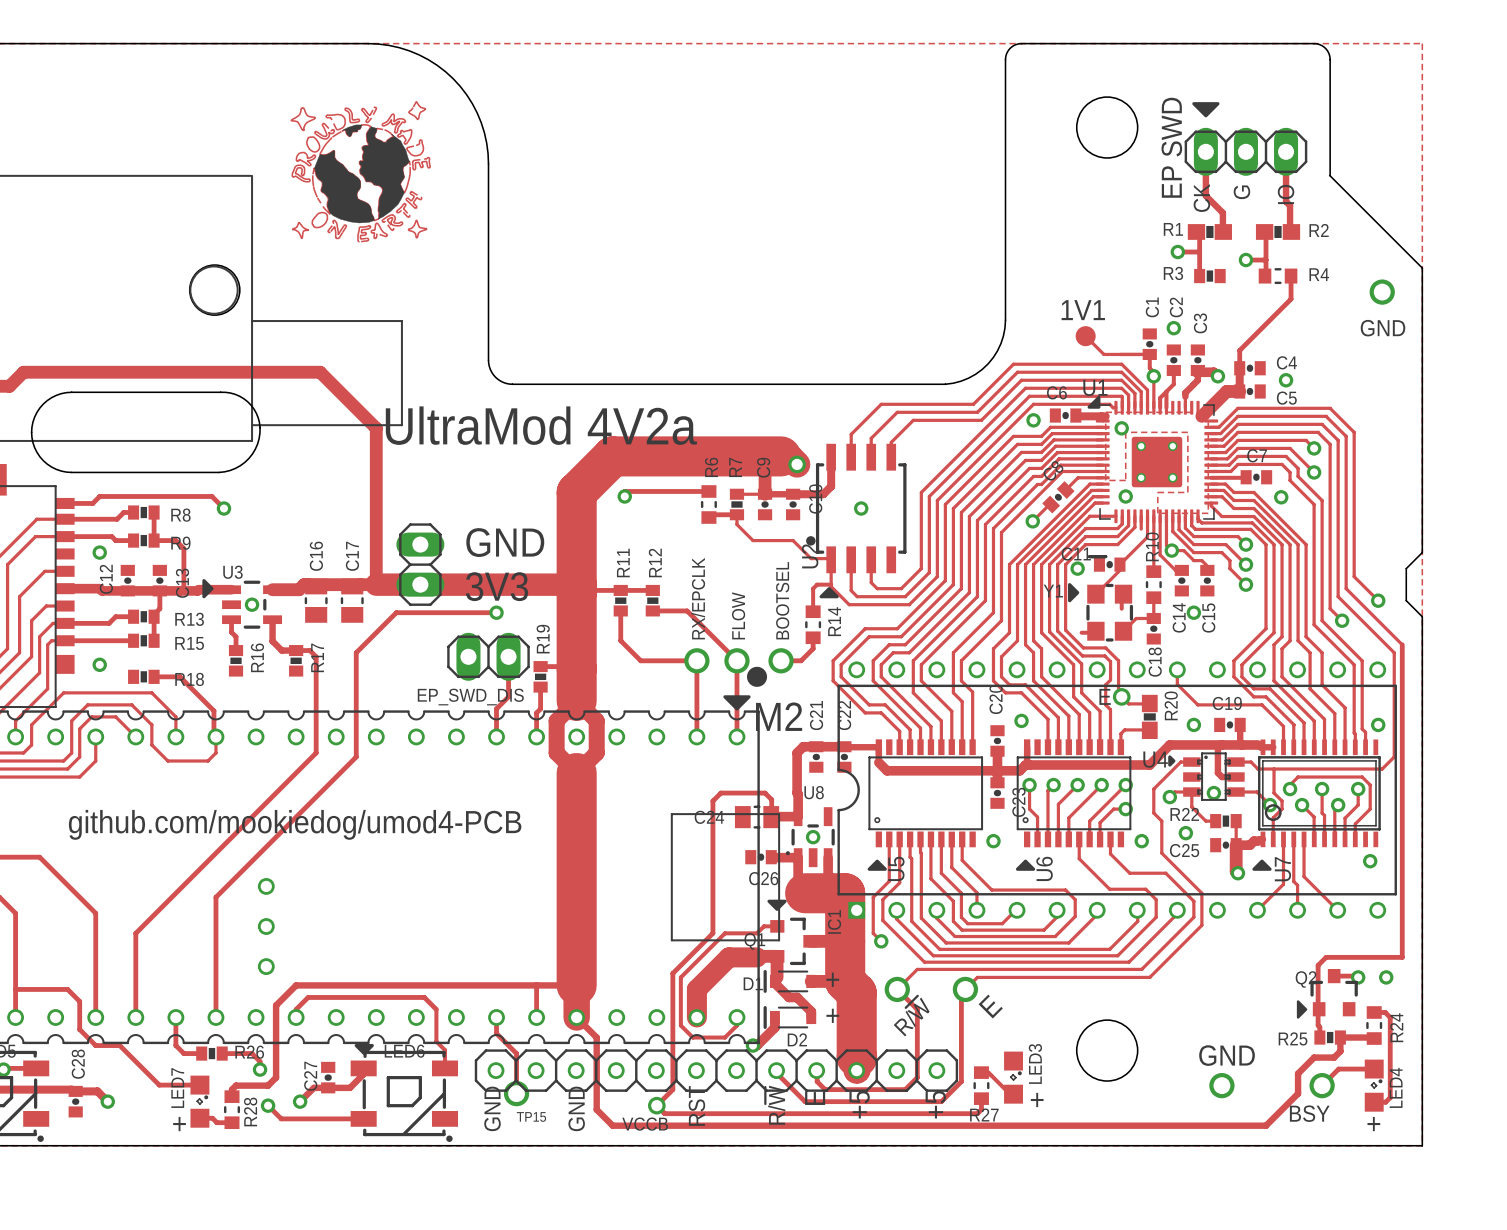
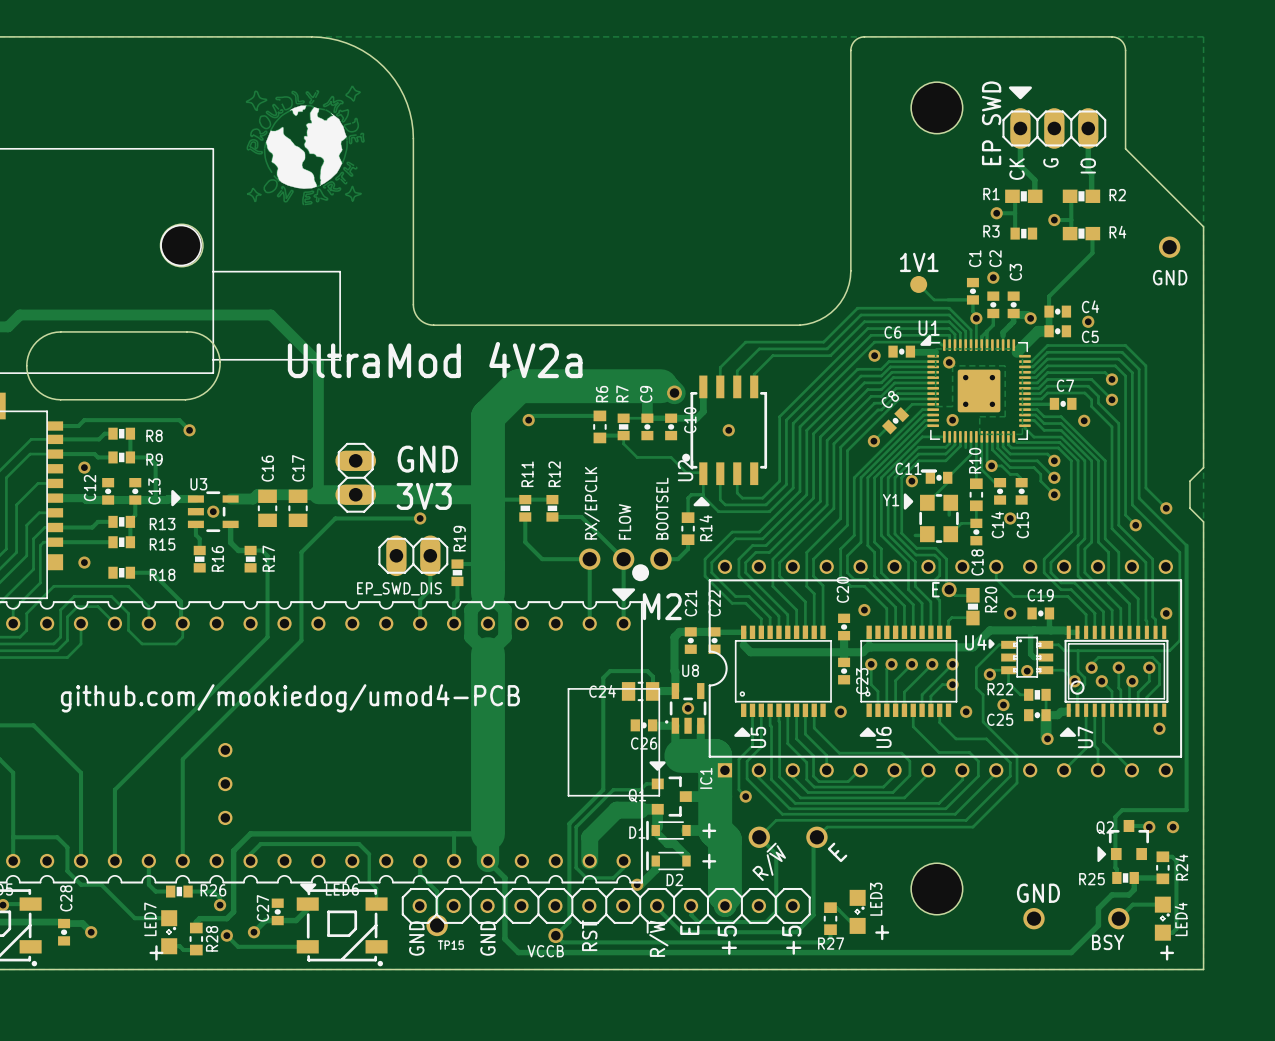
R4 footprint: [1258, 268, 1298, 285] -> [1062, 226, 1101, 241]

